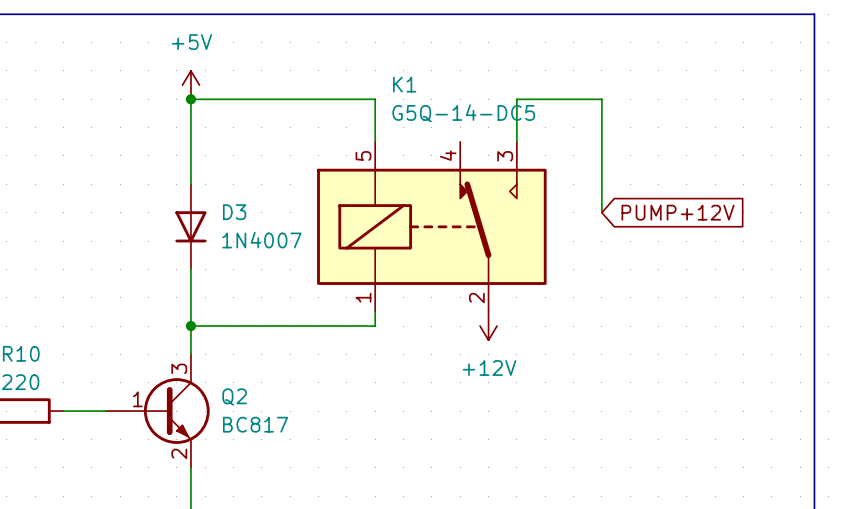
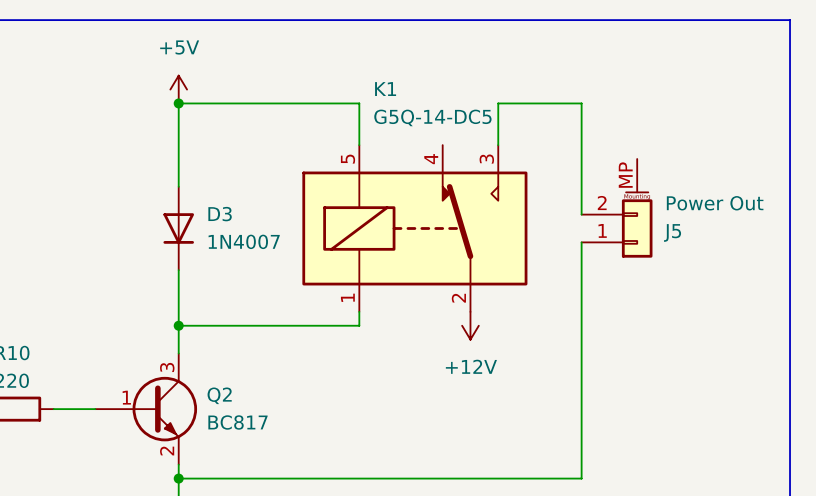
J5: none -> Power Out (617, 208)
global label: PUMP+12V (678, 212) -> none
wire: none -> (581, 242) (581, 478) (178, 478)
junction: none -> (178, 478)

